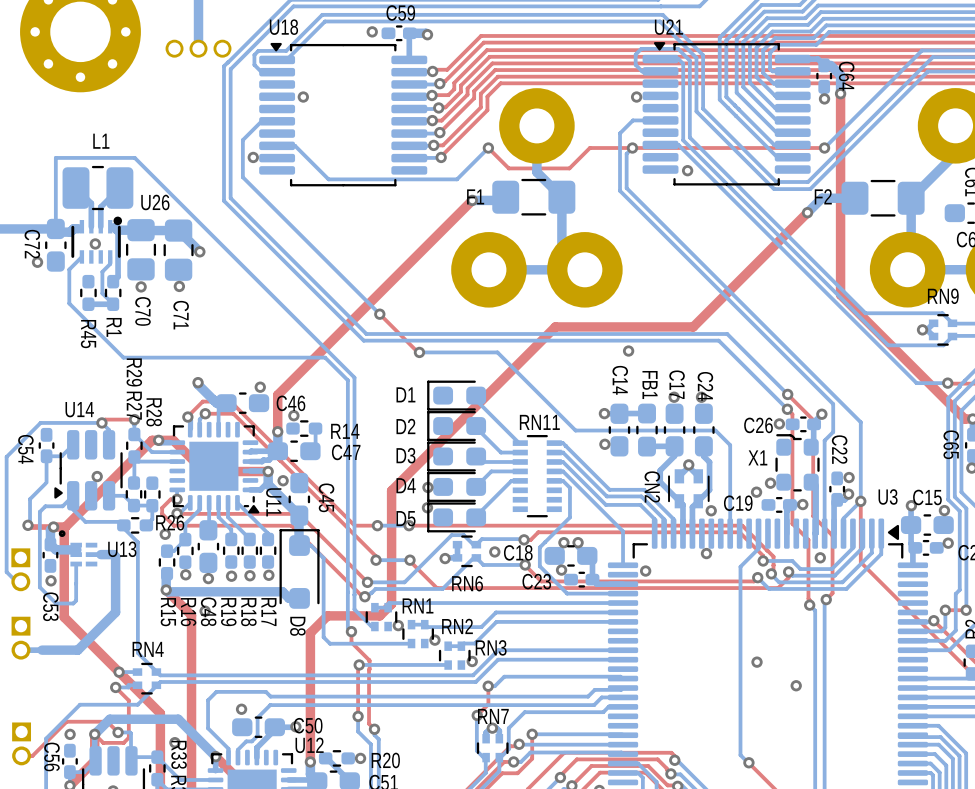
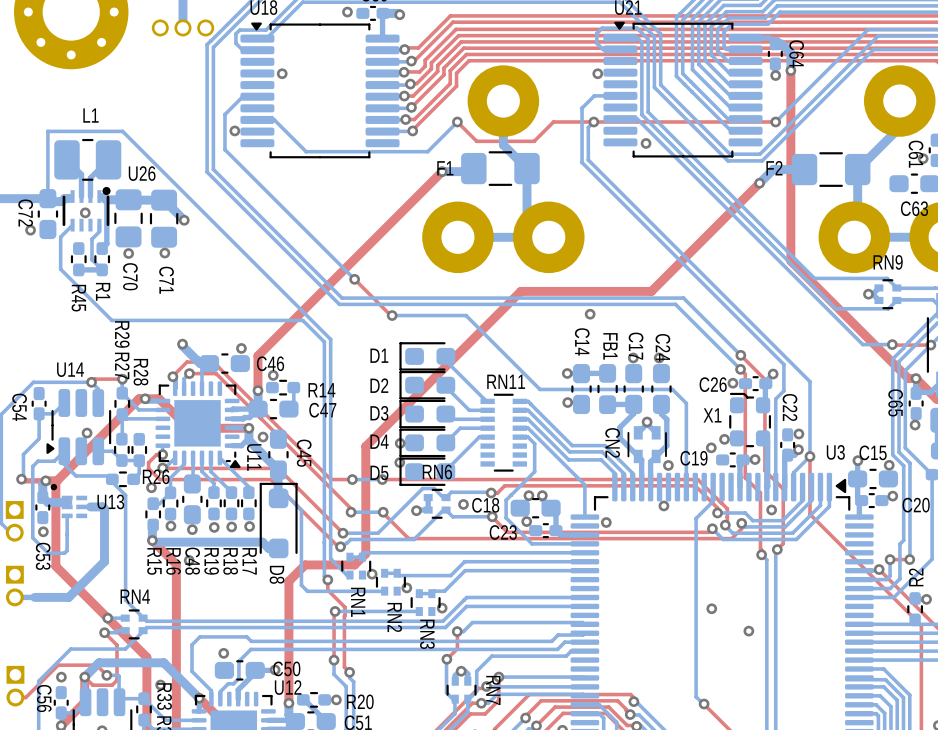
RN6 name position: RN6 (467, 583) -> RN6 (437, 471)
RN1 name rotation: 0° (418, 605) -> 90° clockwise (358, 602)
RN1 name position: RN1 (418, 605) -> RN1 (358, 602)
RN2 name rotation: 0° (457, 626) -> 90° clockwise (394, 617)
RN2 name position: RN2 (457, 626) -> RN2 (394, 617)
RN3 name rotation: 0° (491, 647) -> 90° clockwise (427, 634)
RN3 name position: RN3 (491, 647) -> RN3 (427, 634)
RN7 name rotation: 0° (493, 716) -> 90° clockwise (493, 690)
RN7 name position: RN7 (493, 716) -> RN7 (493, 690)

